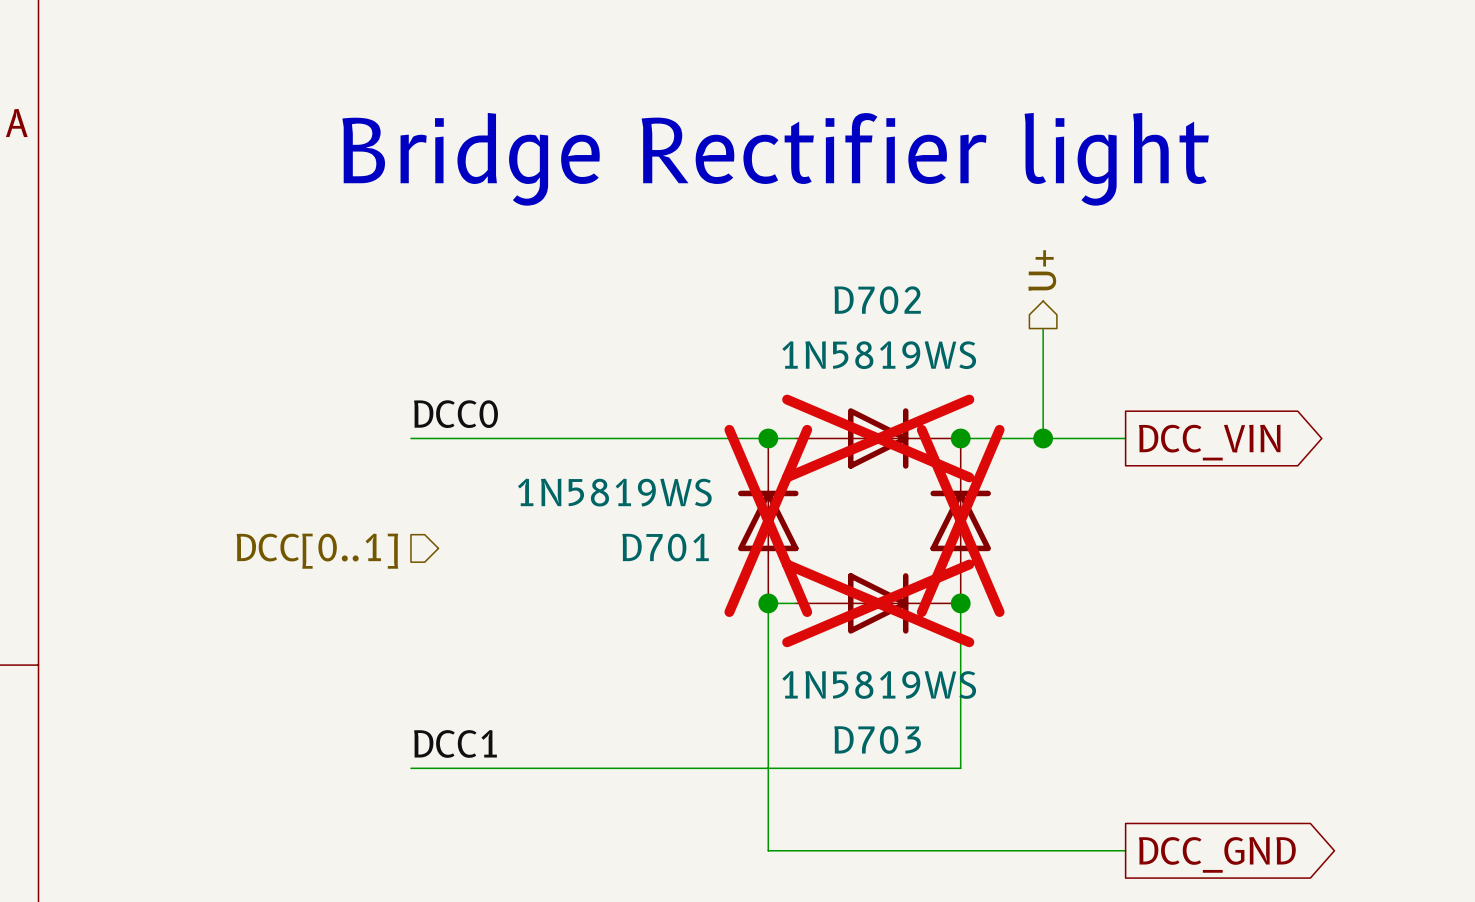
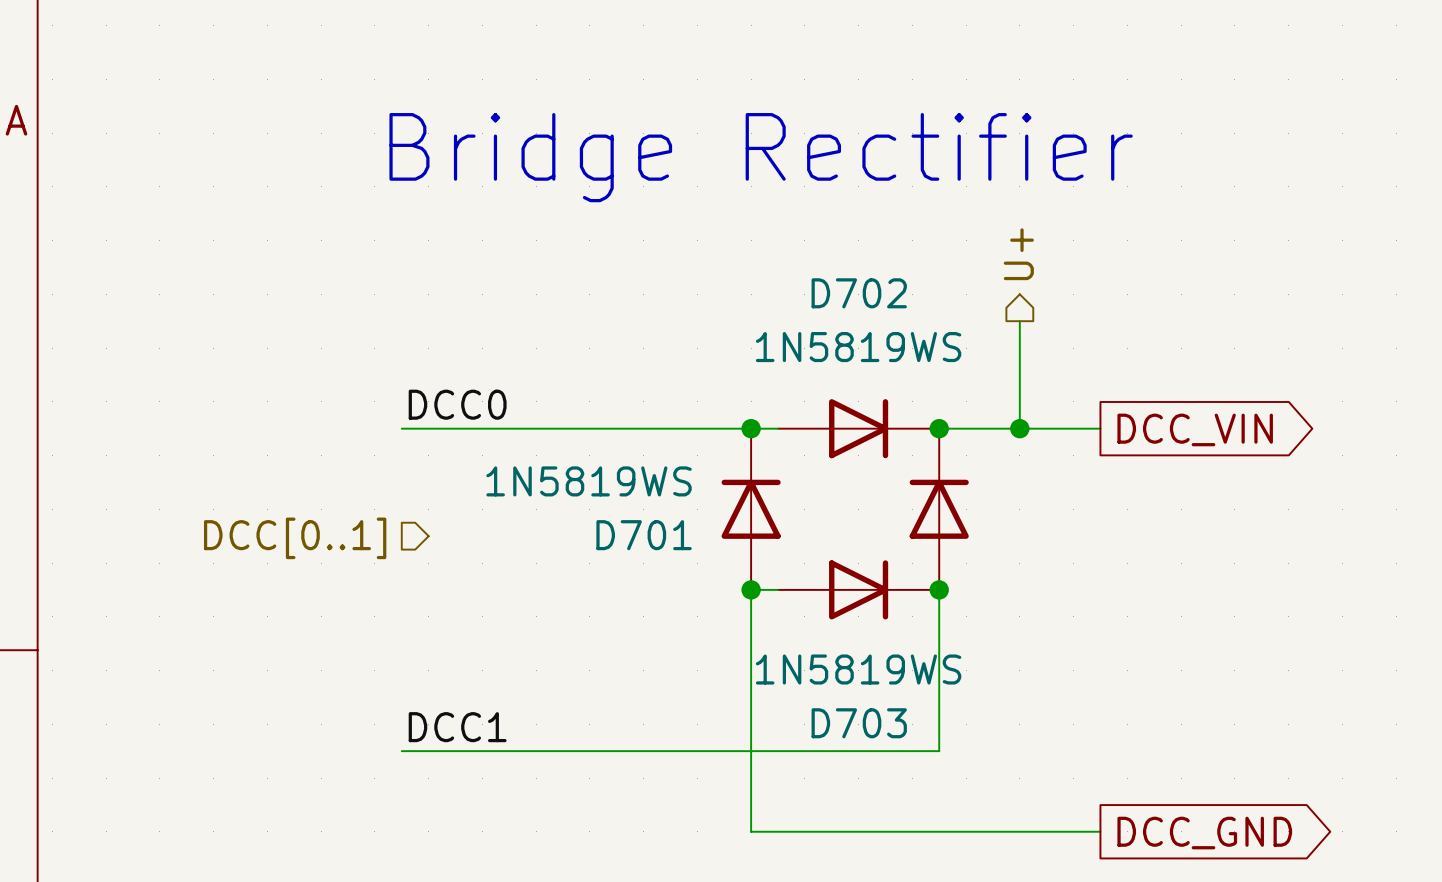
text: Bridge Rectifier light (775, 159) -> Bridge Rectifier (761, 157)
D702 do-not-place cross: (878, 438) -> none
D701 do-not-place cross: (768, 520) -> none
part do-not-place cross: (960, 520) -> none
D703 do-not-place cross: (878, 603) -> none

